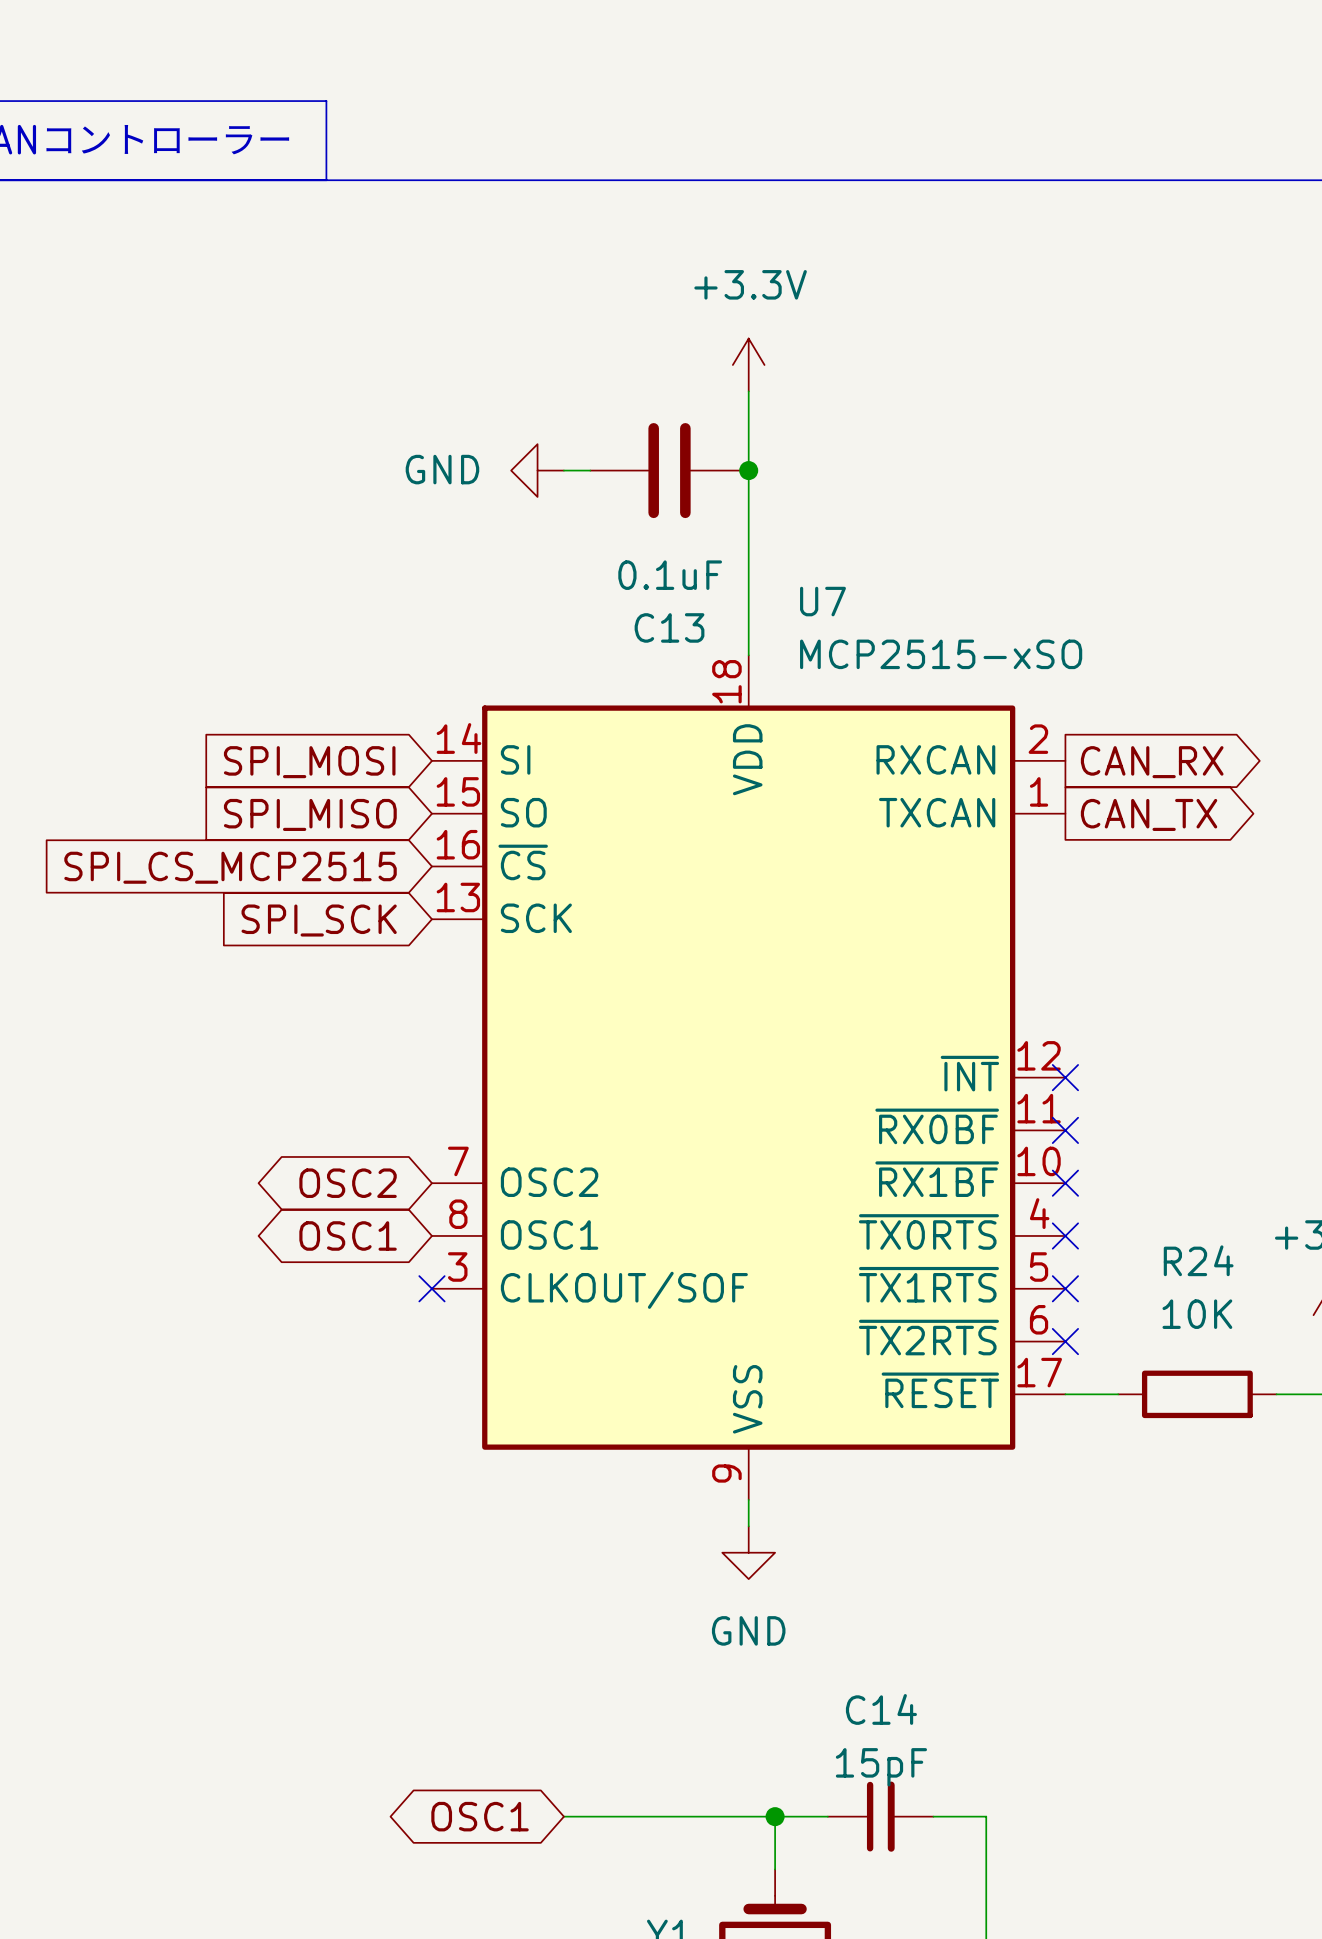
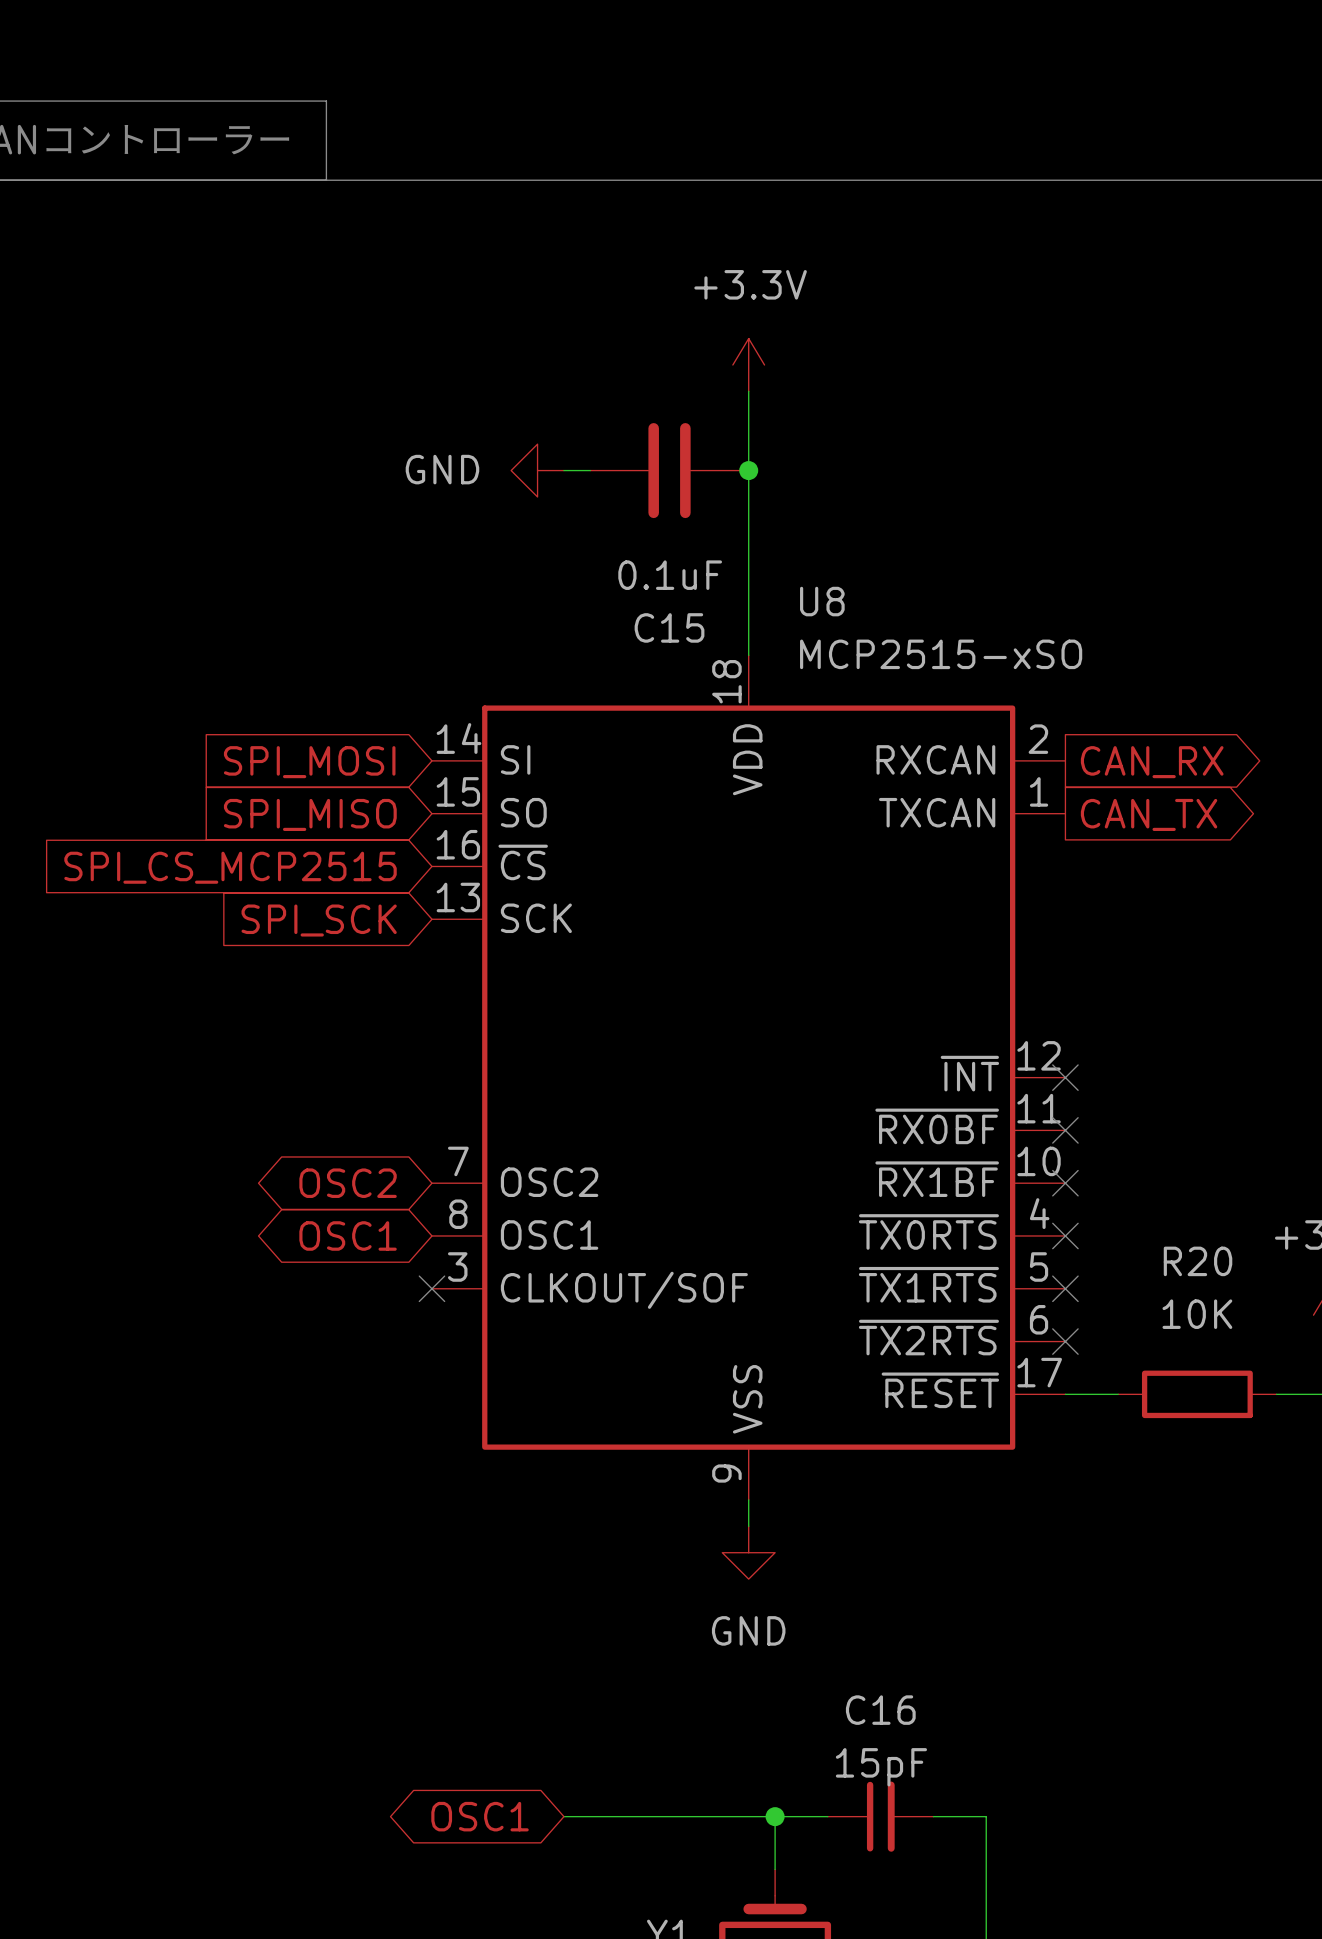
U7 name: U7 (822, 601) -> U8 (822, 601)
C13 name: C13 (669, 627) -> C15 (669, 627)
R24 name: R24 (1198, 1260) -> R20 (1198, 1261)
C14 name: C14 (881, 1709) -> C16 (880, 1710)

